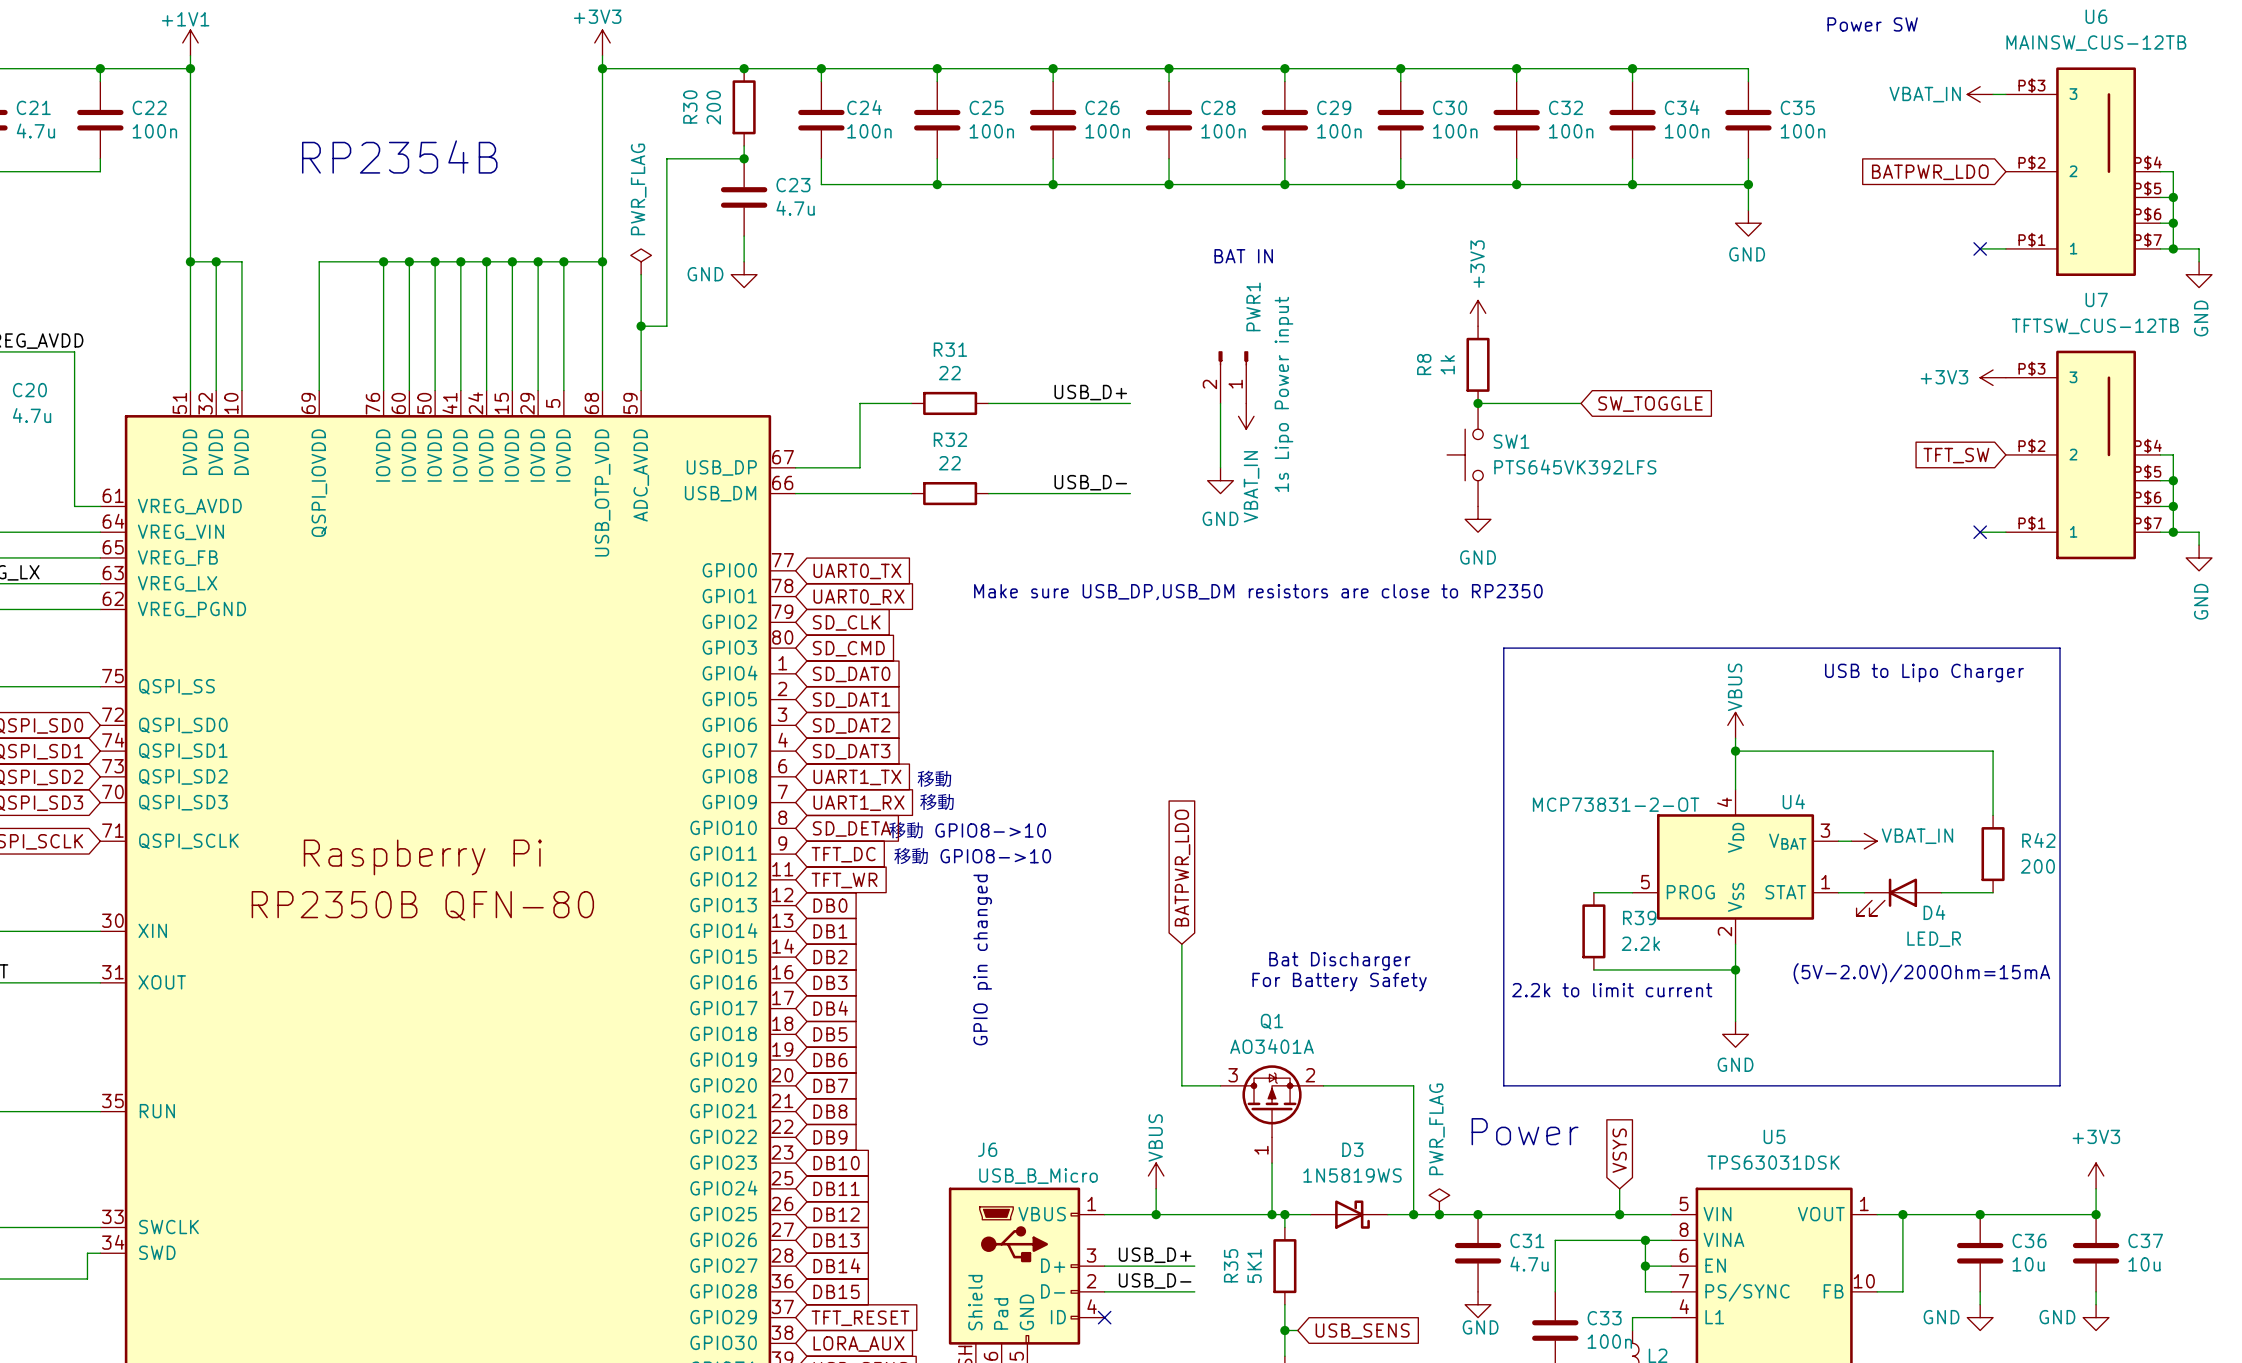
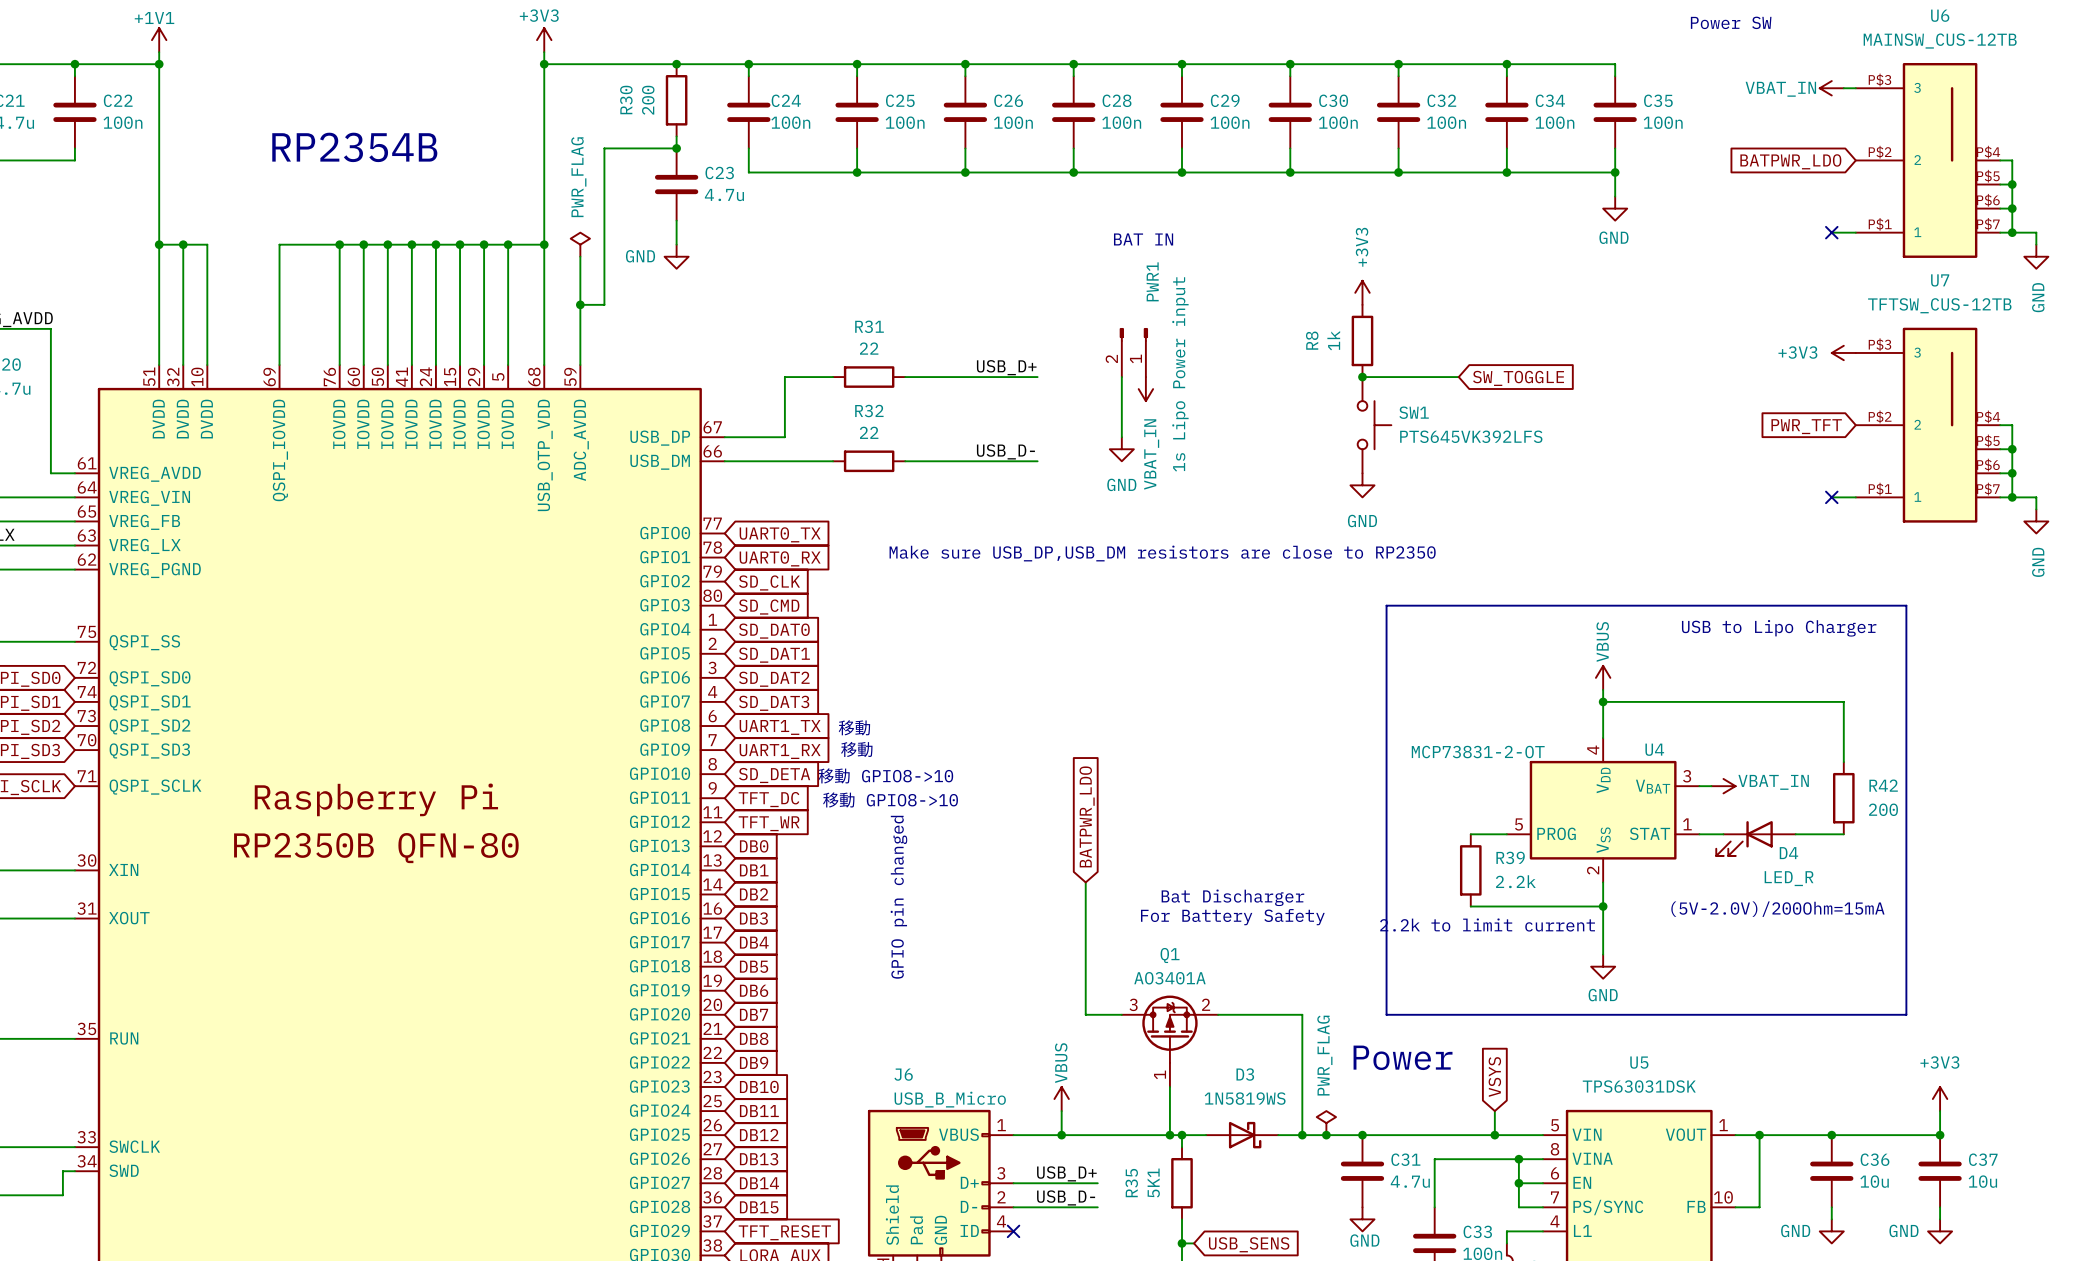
SW1 rotation: 0° (1465, 454) -> 180° (1374, 425)
global label: TFT_SW (1956, 455) -> PWR_TFT (1806, 426)

